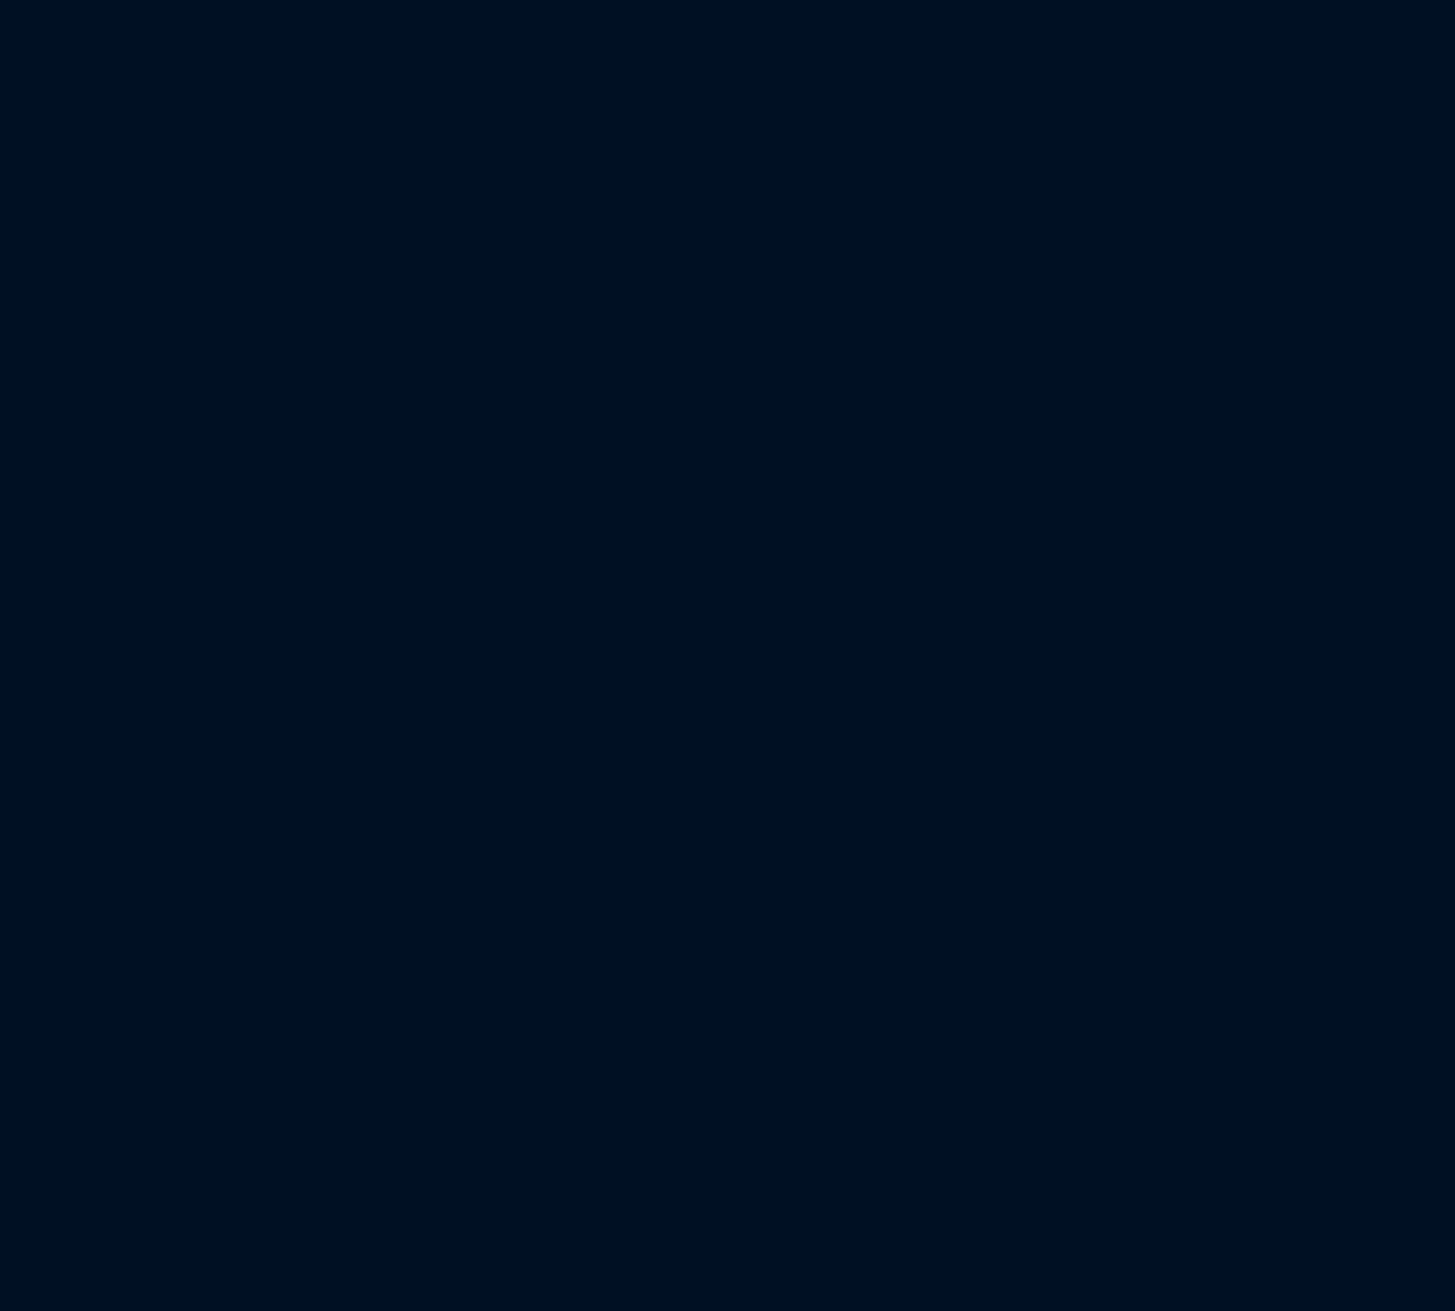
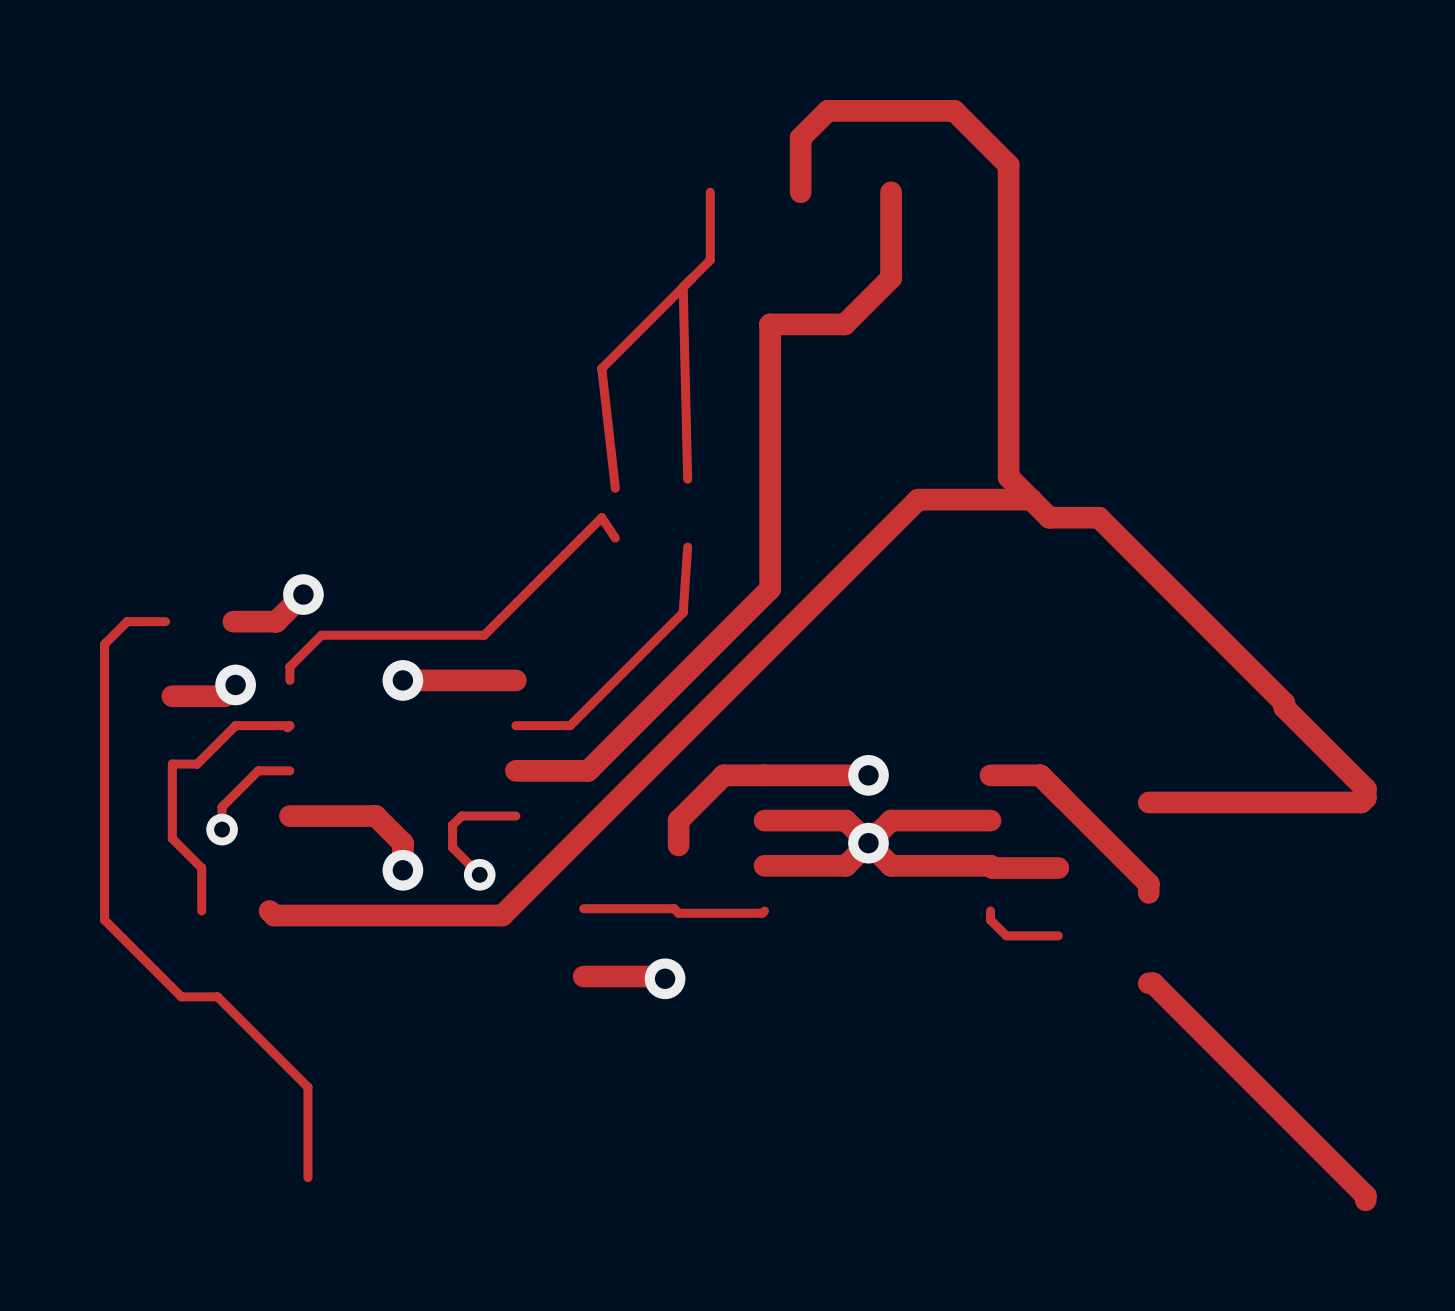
track: none -> (710, 192) (710, 260) (601, 368) (615, 488)
track: none -> (800, 192) (800, 137) (827, 110) (954, 110) (1008, 165) (1008, 477) (1049, 517) (1099, 517) (1284, 703) (1284, 707) (1365, 788) (1365, 797) (1361, 802) (1148, 802)
track: none -> (891, 192) (891, 278) (844, 324) (770, 324) (770, 588) (588, 770) (515, 770)
track: none -> (683, 287) (687, 479)
track: none -> (1031, 499) (918, 499) (502, 915) (274, 915) (269, 910)
track: none -> (615, 538) (601, 517) (484, 635) (321, 635) (289, 666) (289, 680)
track: none -> (687, 547) (683, 612) (570, 725) (515, 725)
track: none -> (303, 594) (276, 621) (233, 621)
via: none -> (303, 594)
track: none -> (165, 621) (127, 621) (104, 644) (104, 920) (181, 996) (217, 996) (307, 1087) (307, 1177)
track: none -> (402, 680) (515, 680)
via: none -> (402, 680)
track: none -> (235, 684) (224, 696) (172, 696)
via: none -> (235, 684)
track: none -> (287, 727) (289, 725) (235, 725) (197, 764) (172, 764) (172, 838) (201, 868) (201, 910)
track: none -> (289, 770) (258, 770) (222, 807) (222, 829)
track: none -> (868, 775) (723, 775) (678, 820) (678, 845)
via: none -> (868, 775)
track: none -> (990, 775) (1040, 775) (1148, 883) (1148, 892)
track: none -> (289, 816) (375, 816) (402, 843) (402, 870)
track: none -> (515, 816) (461, 816) (452, 825) (452, 847) (479, 874)
track: none -> (764, 820) (845, 820) (891, 865) (1058, 868)
track: none -> (990, 820) (891, 820) (845, 865) (764, 865)
via: none -> (222, 829)
via: none -> (868, 843)
via: none -> (402, 870)
via: none -> (479, 874)
track: none -> (583, 908) (674, 908) (678, 913) (762, 913) (764, 910)
track: none -> (990, 910) (990, 920) (1006, 935) (1058, 935)
track: none -> (583, 976) (662, 976) (665, 978)
via: none -> (665, 978)
track: none -> (1148, 983) (1153, 983) (1365, 1195) (1365, 1200)

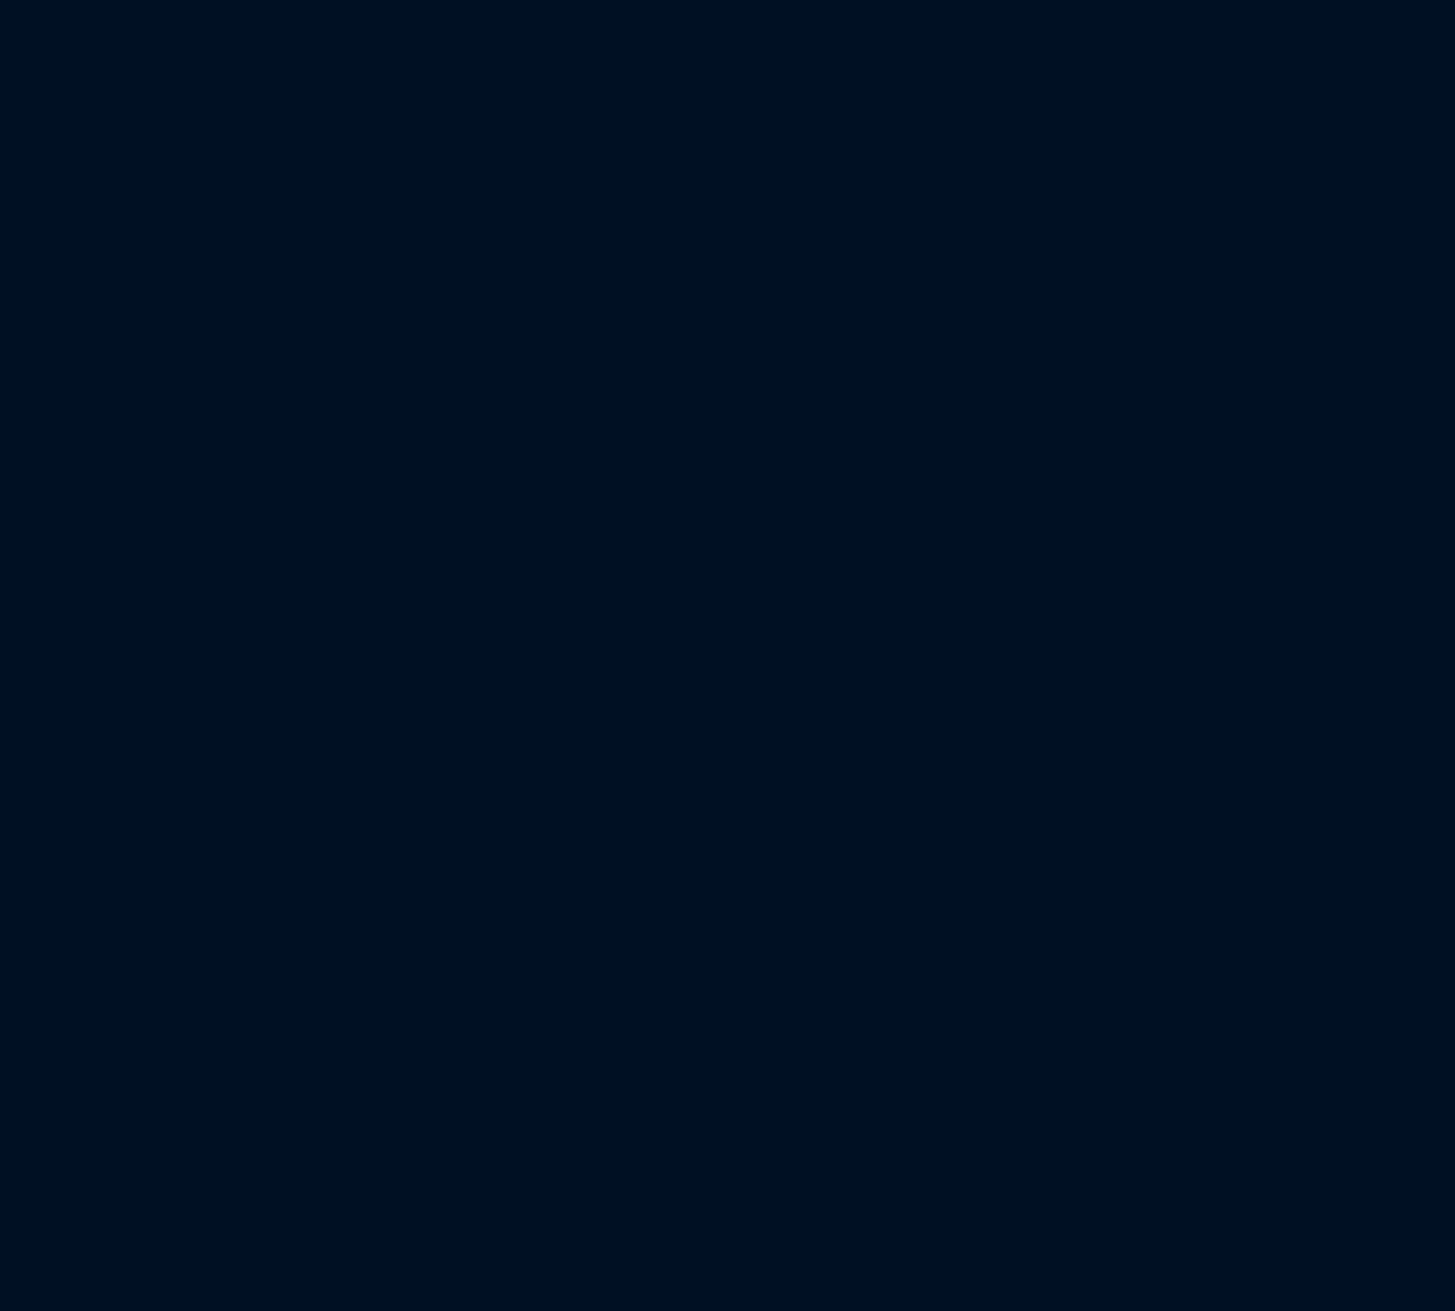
track: (710, 192) (710, 260) (601, 368) (615, 488) -> none
track: (800, 192) (800, 137) (827, 110) (954, 110) (1008, 165) (1008, 477) (1049, 517) (1099, 517) (1284, 703) (1284, 707) (1365, 788) (1365, 797) (1361, 802) (1148, 802) -> none
track: (891, 192) (891, 278) (844, 324) (770, 324) (770, 588) (588, 770) (515, 770) -> none
track: (683, 287) (687, 479) -> none
track: (1031, 499) (918, 499) (502, 915) (274, 915) (269, 910) -> none
track: (615, 538) (601, 517) (484, 635) (321, 635) (289, 666) (289, 680) -> none
track: (687, 547) (683, 612) (570, 725) (515, 725) -> none
track: (303, 594) (276, 621) (233, 621) -> none
via: (303, 594) -> none
track: (165, 621) (127, 621) (104, 644) (104, 920) (181, 996) (217, 996) (307, 1087) (307, 1177) -> none
track: (402, 680) (515, 680) -> none
via: (402, 680) -> none
track: (235, 684) (224, 696) (172, 696) -> none
via: (235, 684) -> none
track: (287, 727) (289, 725) (235, 725) (197, 764) (172, 764) (172, 838) (201, 868) (201, 910) -> none
track: (289, 770) (258, 770) (222, 807) (222, 829) -> none
track: (868, 775) (723, 775) (678, 820) (678, 845) -> none
via: (868, 775) -> none
track: (990, 775) (1040, 775) (1148, 883) (1148, 892) -> none
track: (289, 816) (375, 816) (402, 843) (402, 870) -> none
track: (515, 816) (461, 816) (452, 825) (452, 847) (479, 874) -> none
track: (764, 820) (845, 820) (891, 865) (1058, 868) -> none
track: (990, 820) (891, 820) (845, 865) (764, 865) -> none
via: (222, 829) -> none
via: (868, 843) -> none
via: (402, 870) -> none
via: (479, 874) -> none
track: (583, 908) (674, 908) (678, 913) (762, 913) (764, 910) -> none
track: (990, 910) (990, 920) (1006, 935) (1058, 935) -> none
track: (583, 976) (662, 976) (665, 978) -> none
via: (665, 978) -> none
track: (1148, 983) (1153, 983) (1365, 1195) (1365, 1200) -> none

